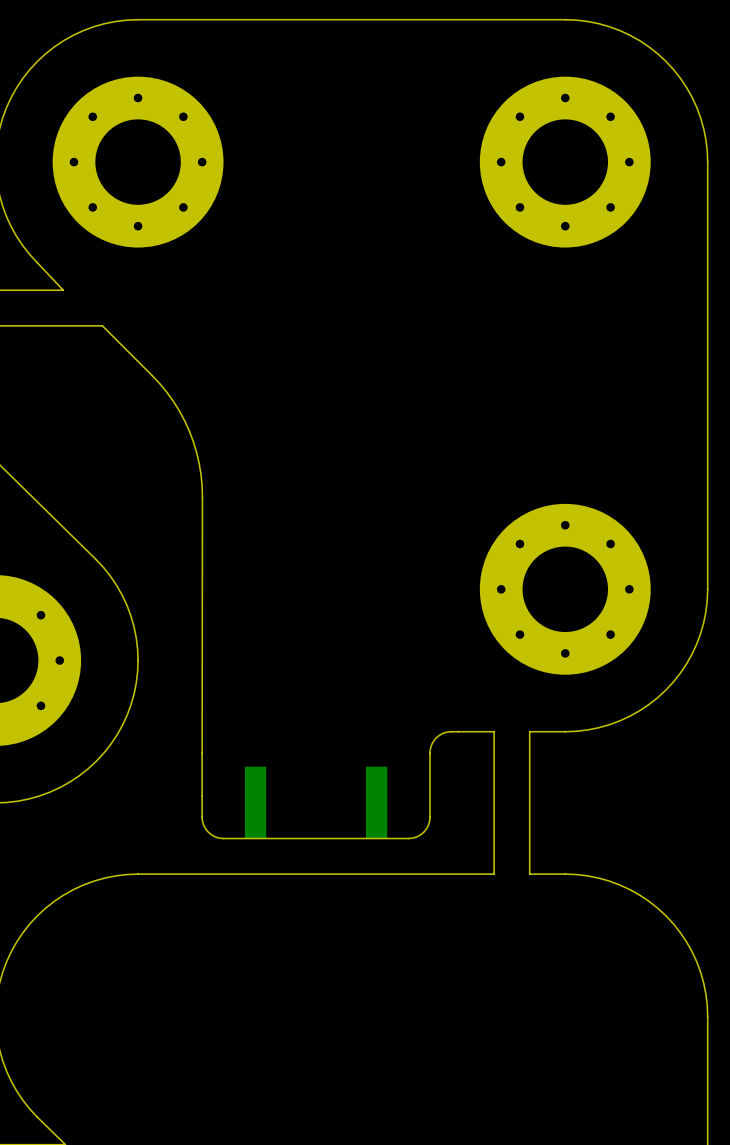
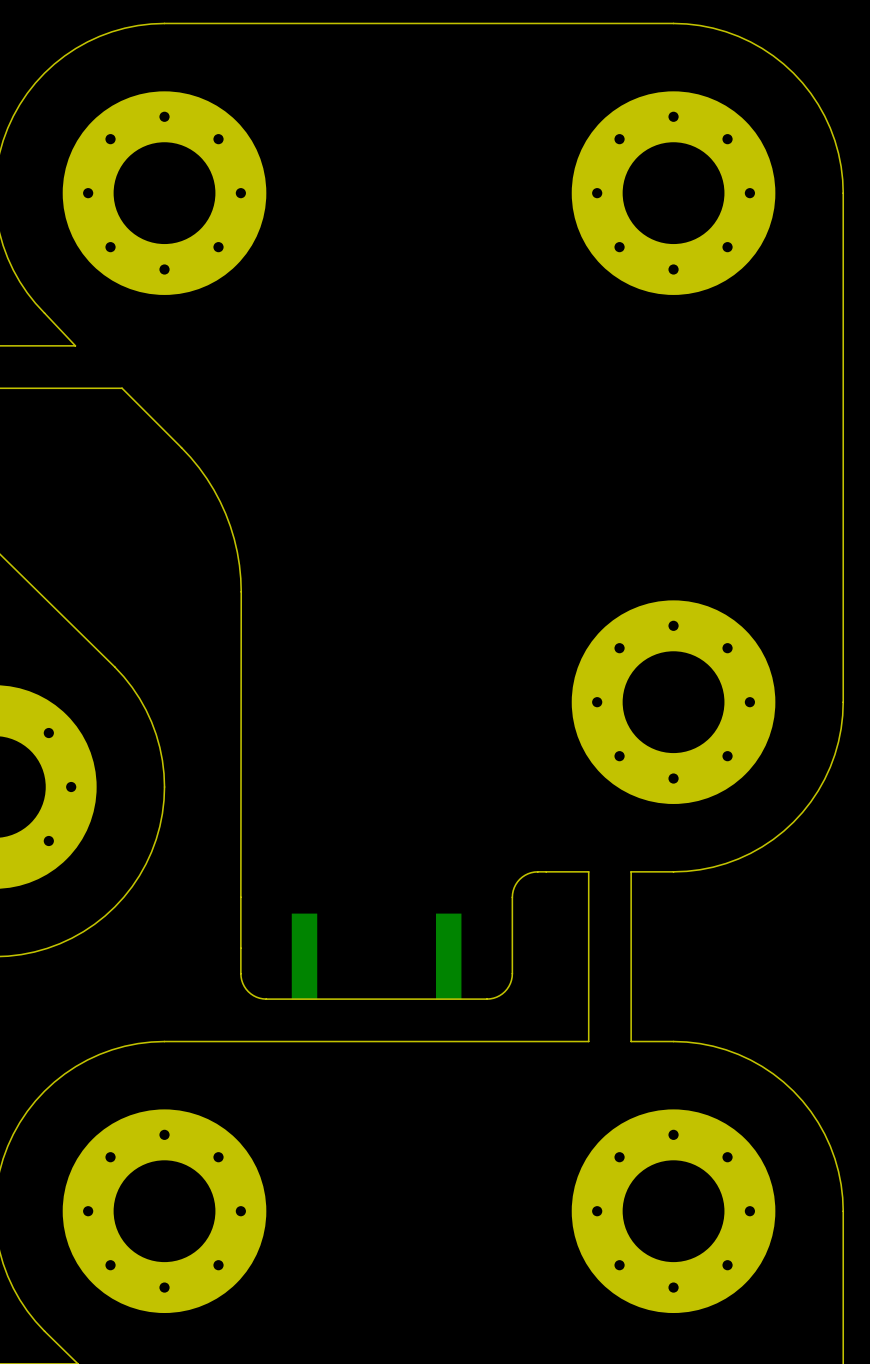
part: none -> (164, 1211)
part: none -> (673, 1211)

